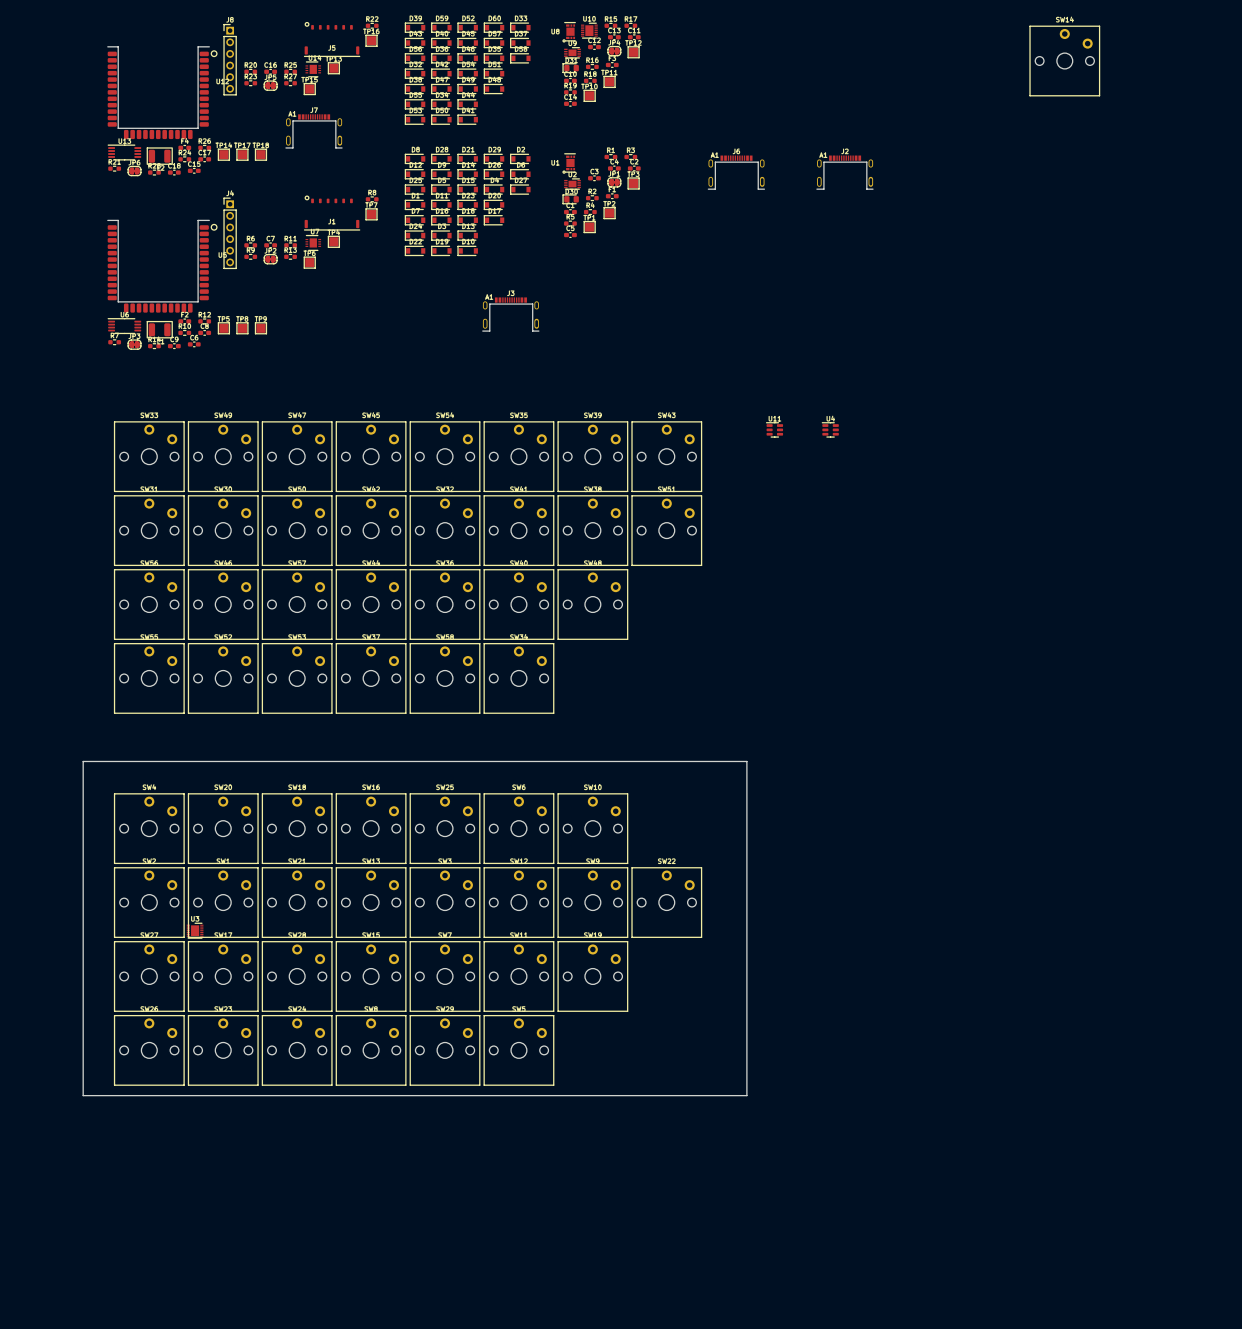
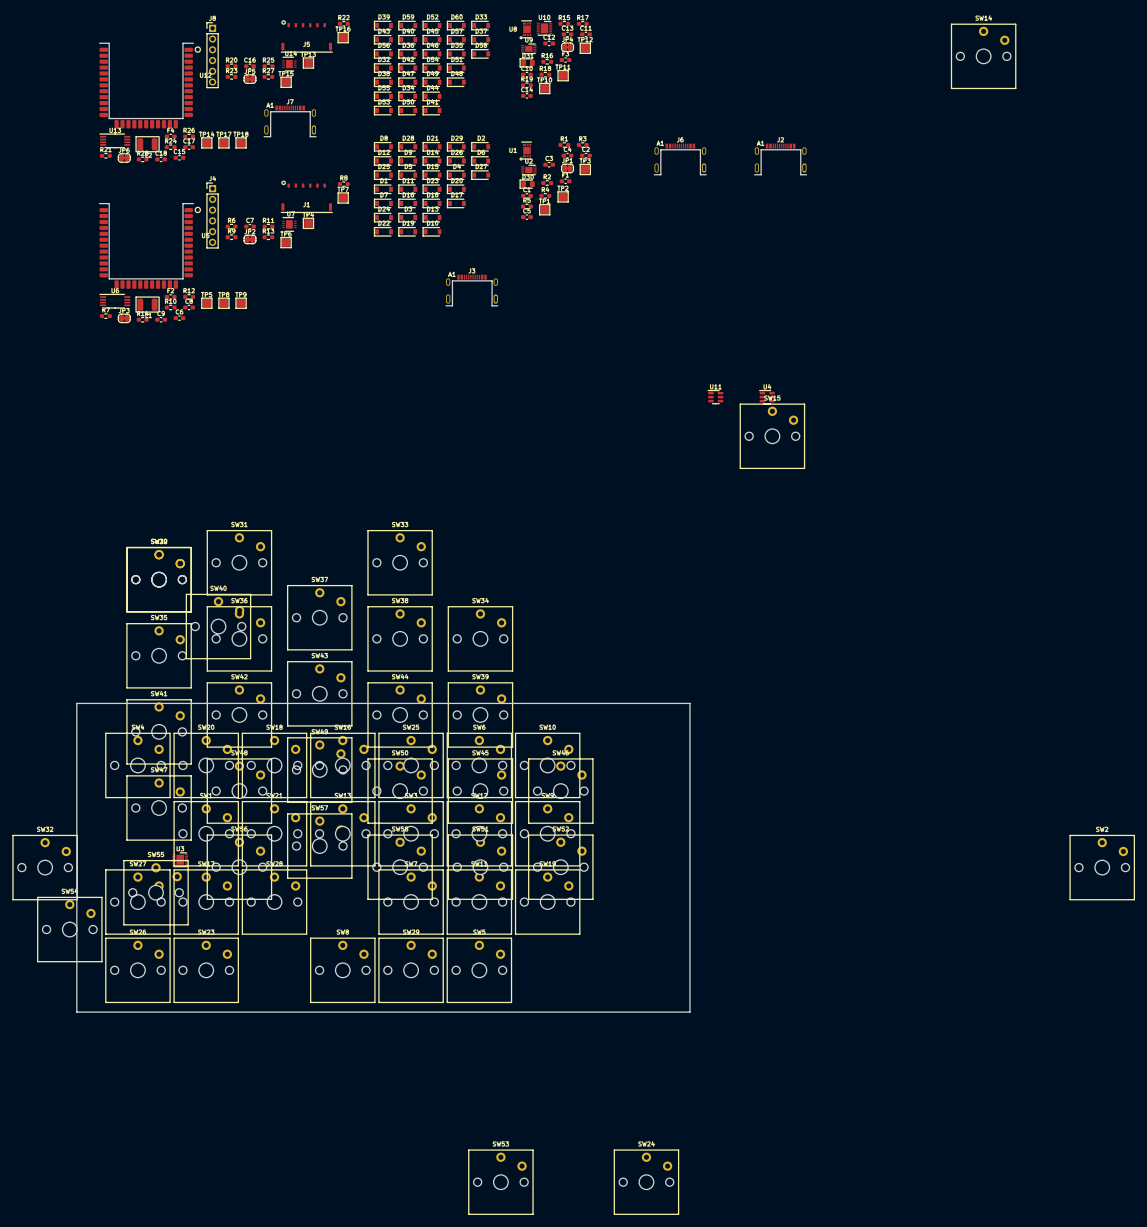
part position: (149, 456) -> (400, 562)
part position: (223, 456) -> (319, 769)
part position: (297, 456) -> (159, 808)
part position: (371, 456) -> (480, 791)
part position: (445, 456) -> (69, 929)
part position: (518, 456) -> (159, 655)
part position: (592, 456) -> (480, 714)
part position: (666, 456) -> (319, 693)
part position: (149, 530) -> (239, 562)
part position: (223, 530) -> (159, 579)
part position: (297, 530) -> (400, 791)
part position: (371, 530) -> (239, 714)
part position: (445, 530) -> (45, 867)
part position: (518, 530) -> (159, 731)
part position: (592, 530) -> (400, 638)
part position: (666, 530) -> (480, 867)
part position: (149, 604) -> (239, 867)
part position: (223, 604) -> (560, 791)
part position: (297, 604) -> (319, 846)
part position: (371, 604) -> (400, 714)
part position: (445, 604) -> (239, 638)
part position: (518, 604) -> (218, 626)
part position: (592, 604) -> (239, 791)
part position: (149, 678) -> (156, 892)
part position: (223, 678) -> (560, 867)
part position: (297, 678) -> (500, 1182)
part position: (371, 678) -> (319, 617)
part position: (445, 678) -> (400, 867)
part position: (518, 678) -> (480, 638)
part position: (149, 902) -> (1102, 867)
part position: (666, 902) -> (159, 579)
part position: (371, 976) -> (772, 436)
part position: (297, 1050) -> (646, 1182)

